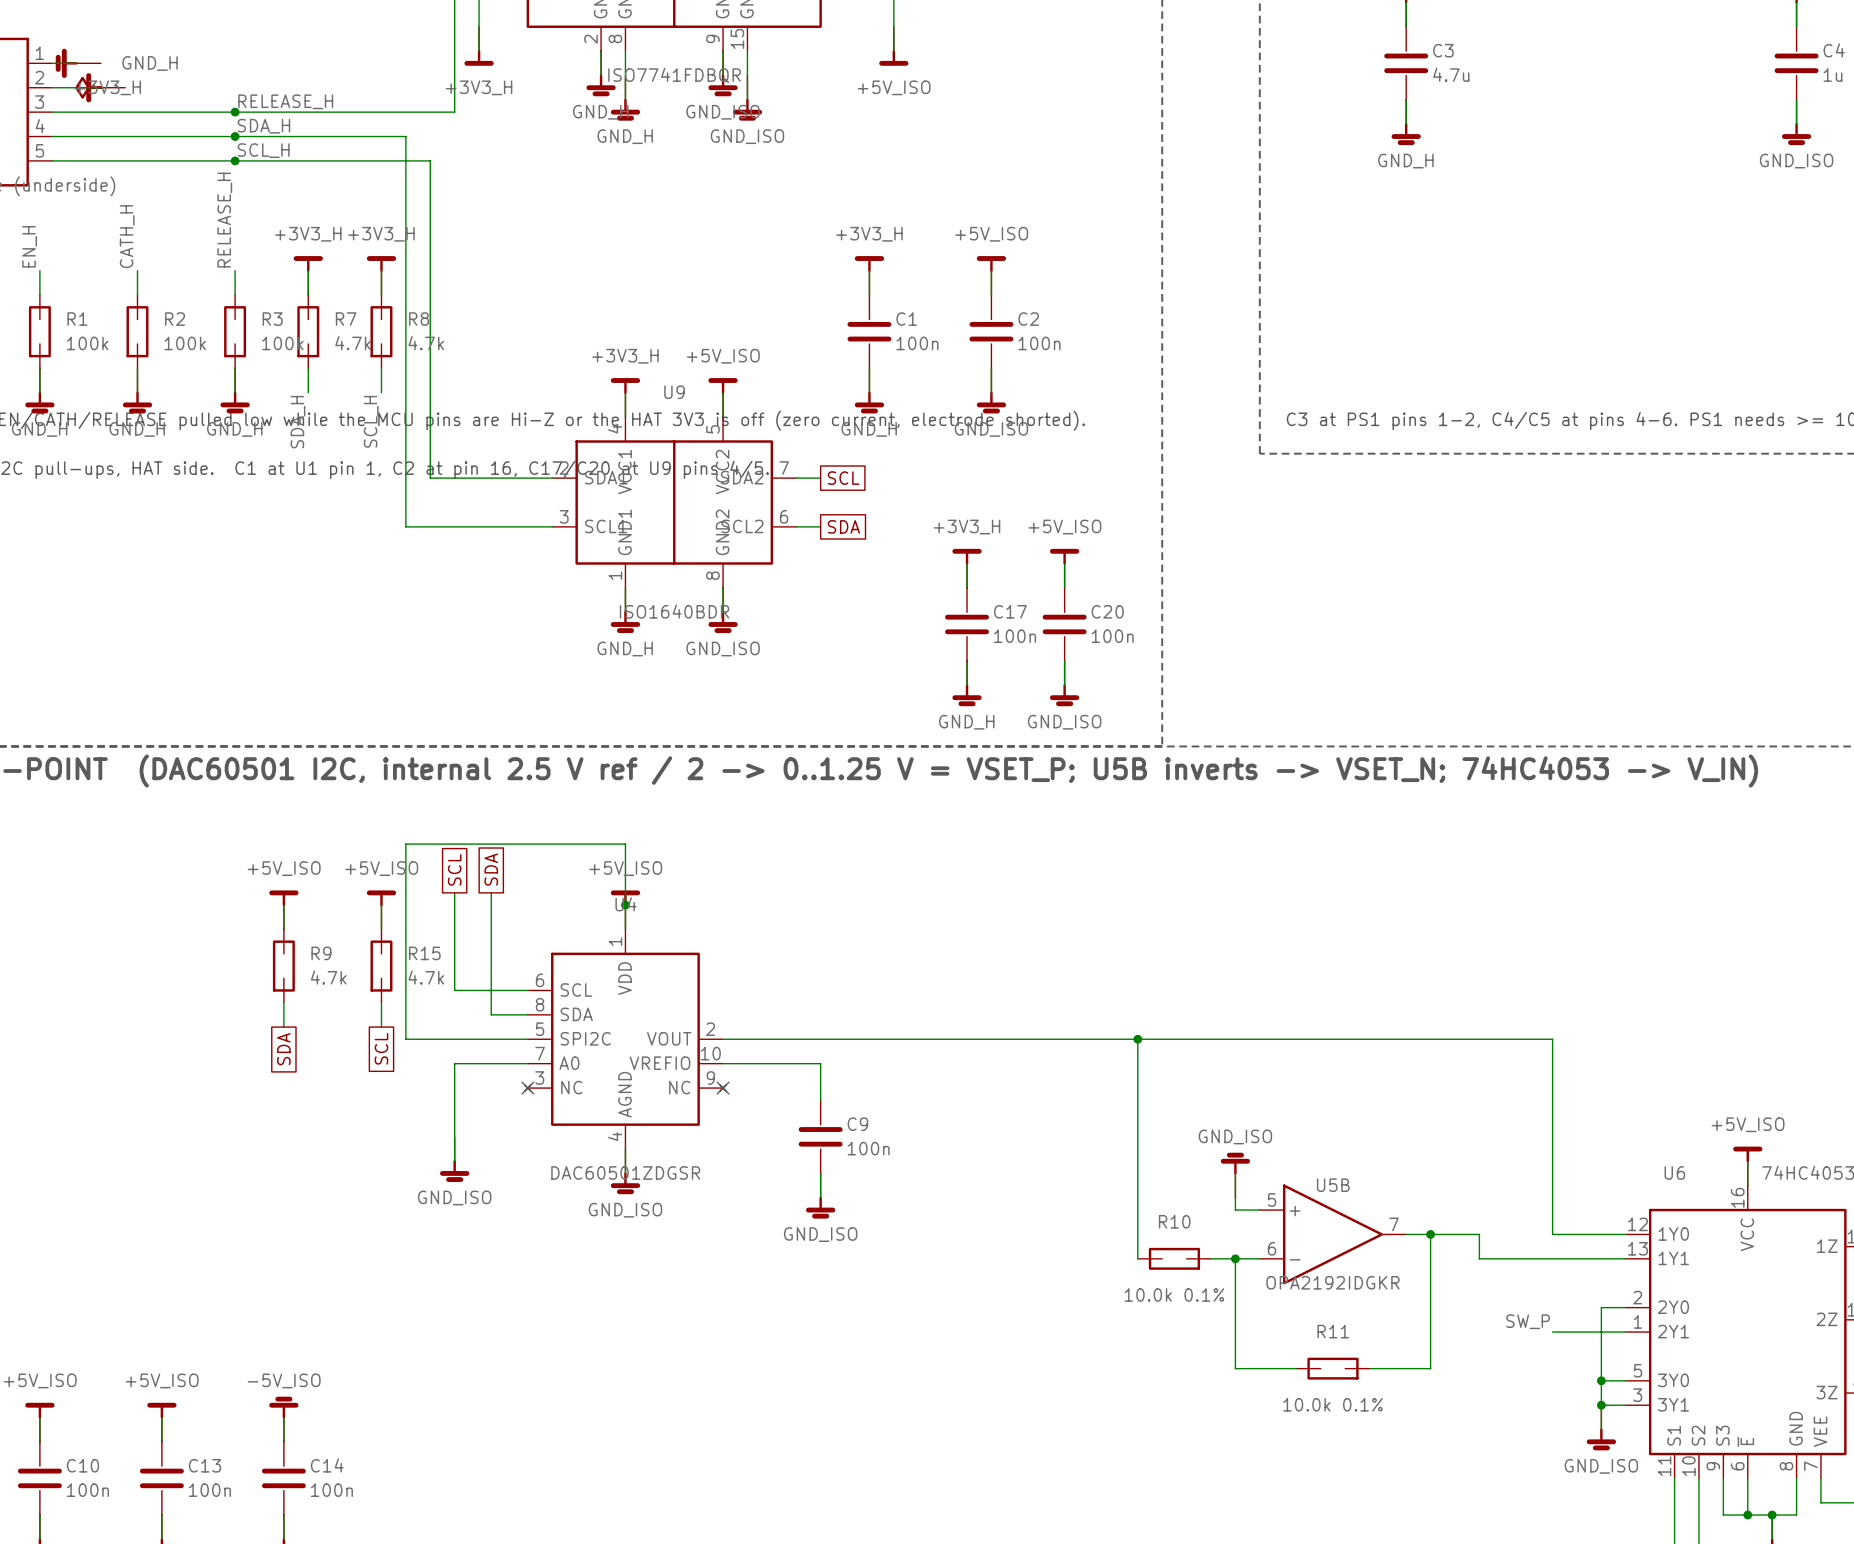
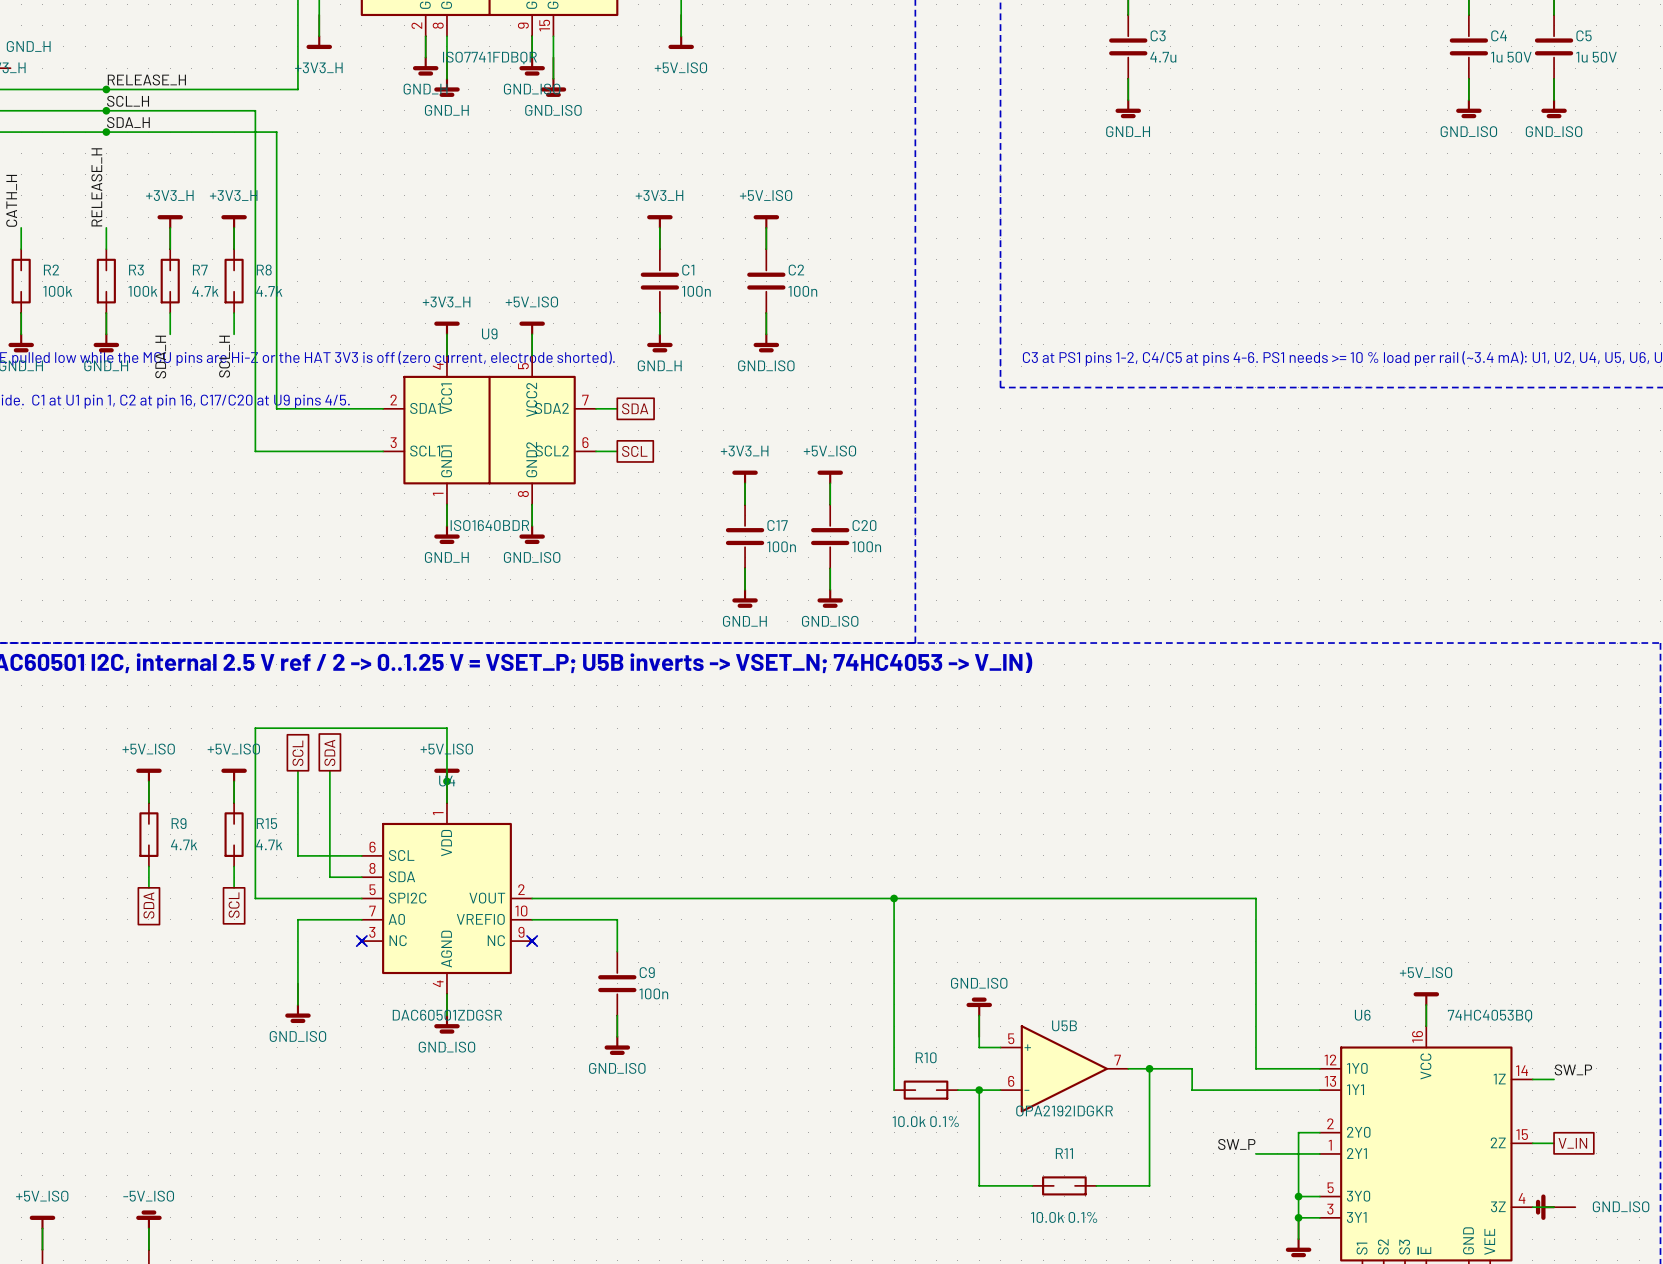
label: SDA_H (263, 126) -> SCL_H (128, 101)
label: SCL_H (263, 150) -> SDA_H (128, 122)
global label: SCL (843, 478) -> SDA (635, 408)
global label: SDA (843, 526) -> SCL (634, 451)

